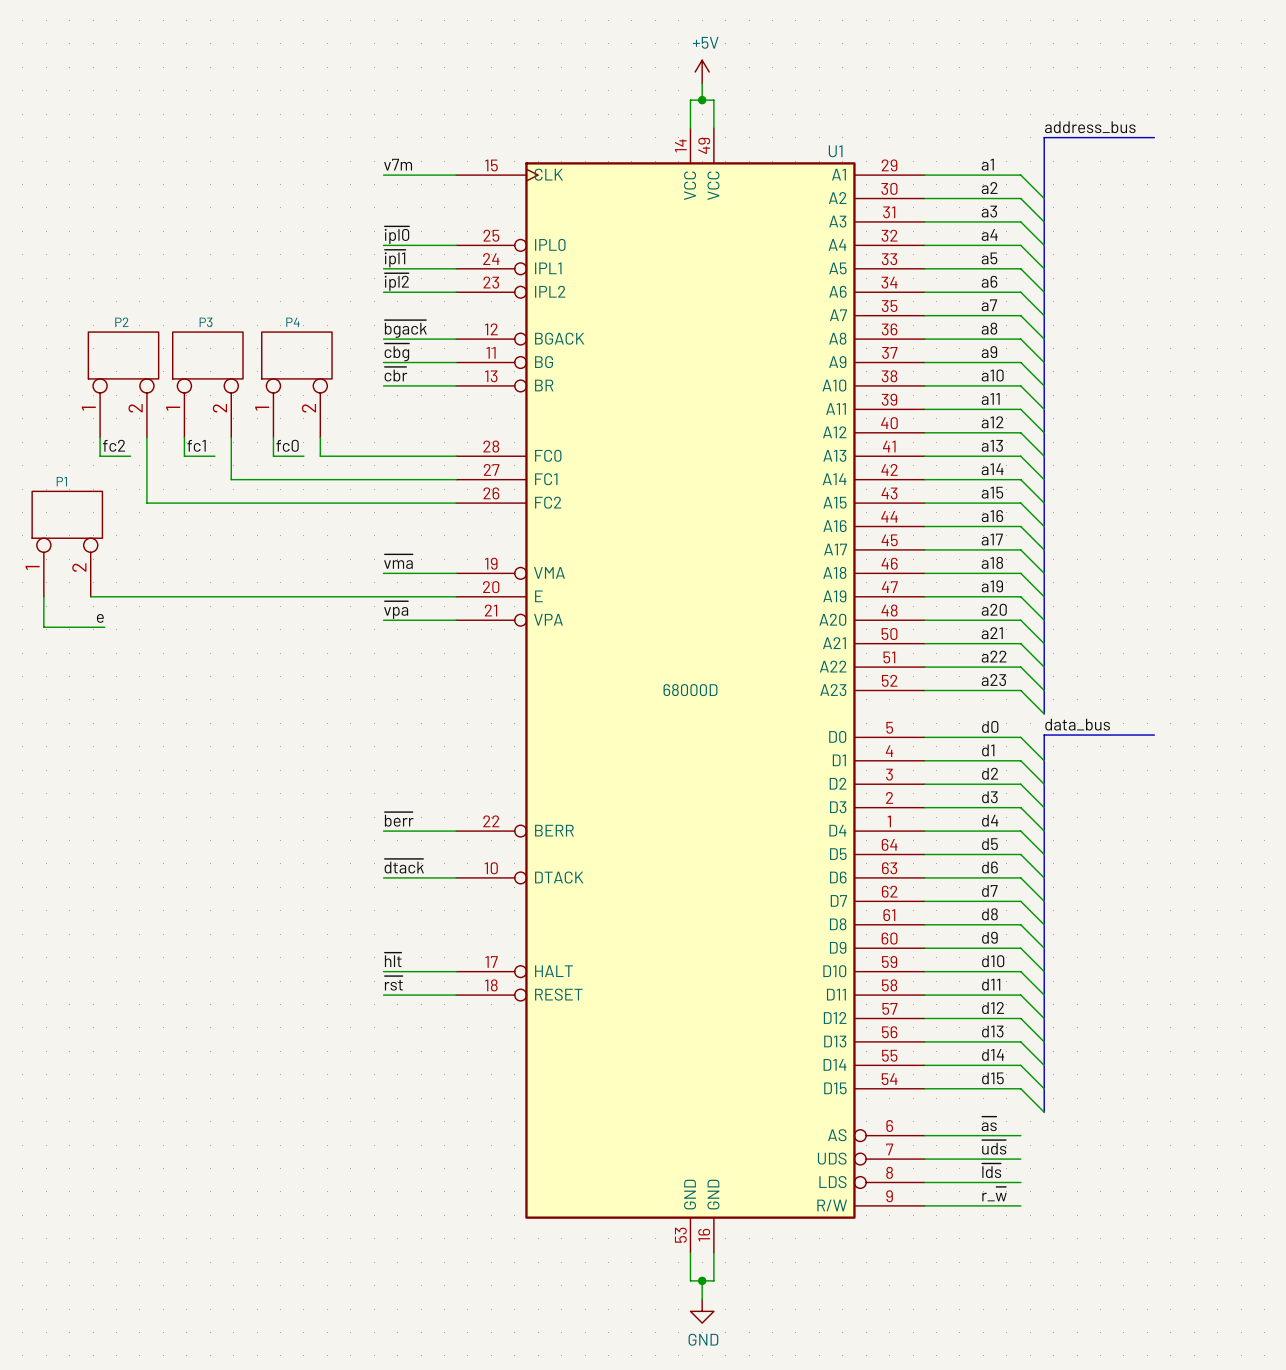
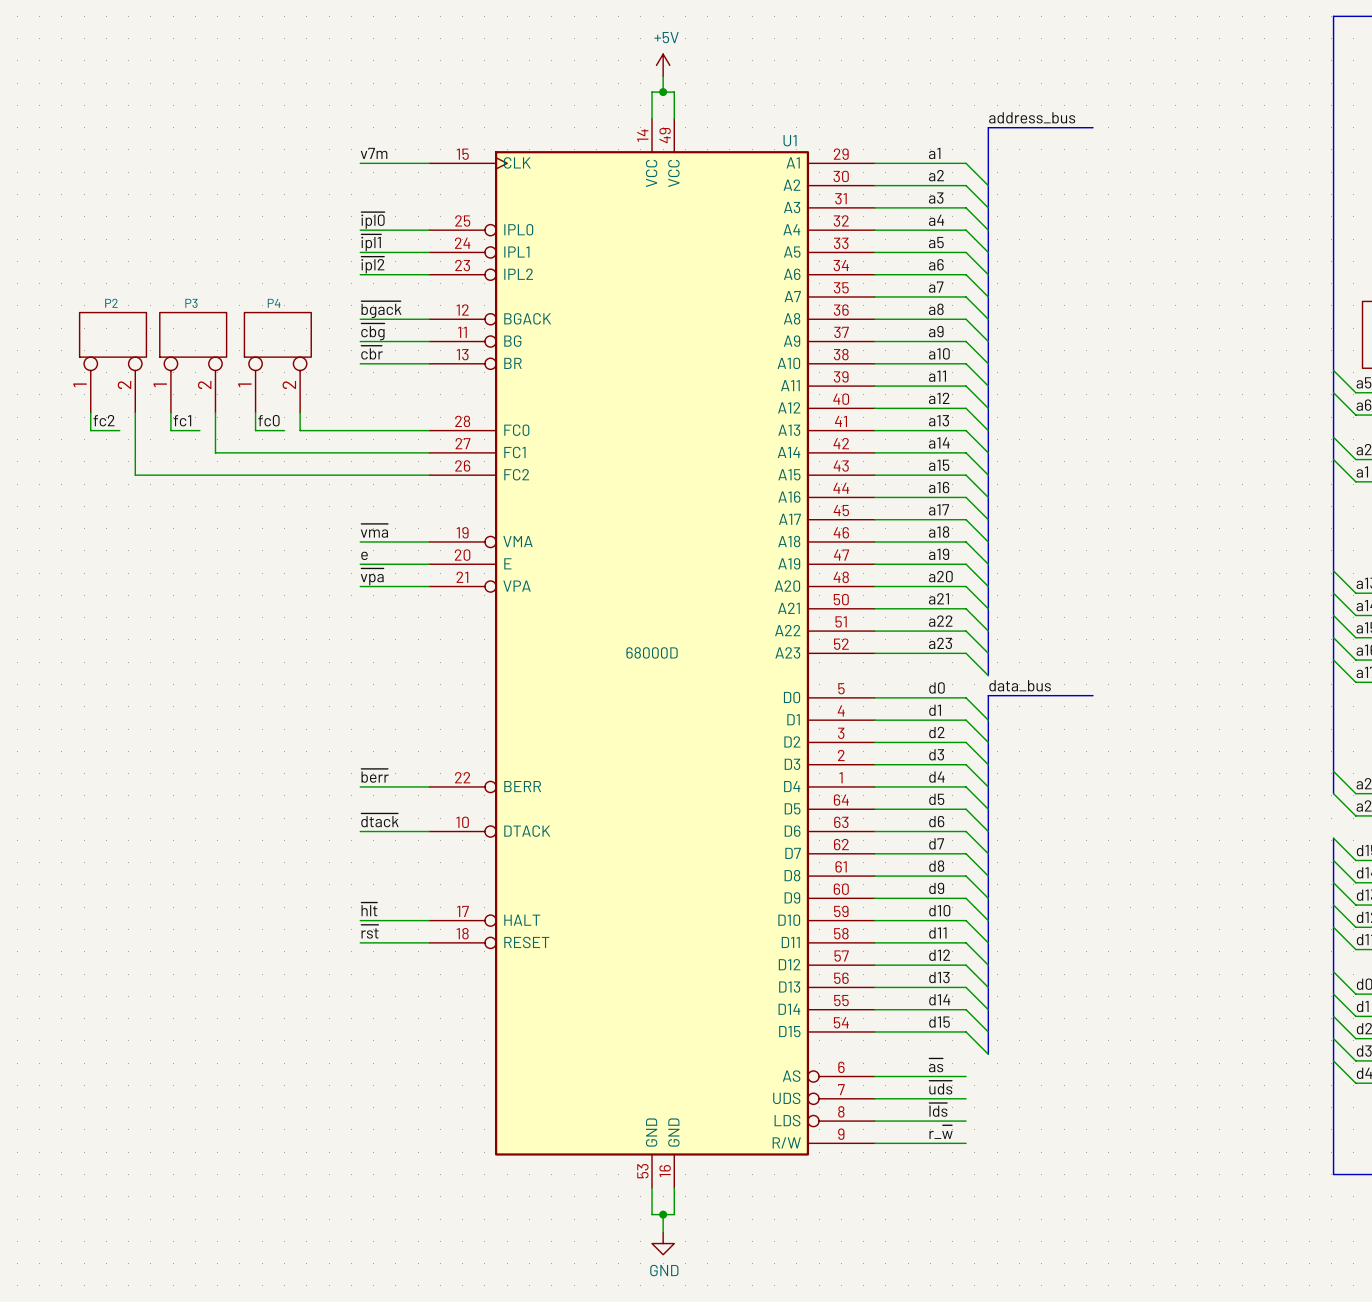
P1: (67, 544) -> none
label: none -> e (364, 555)
wire: (43, 596) (43, 627) (104, 627) -> none
wire: (90, 596) (383, 596) -> none
label: e (100, 618) -> none

